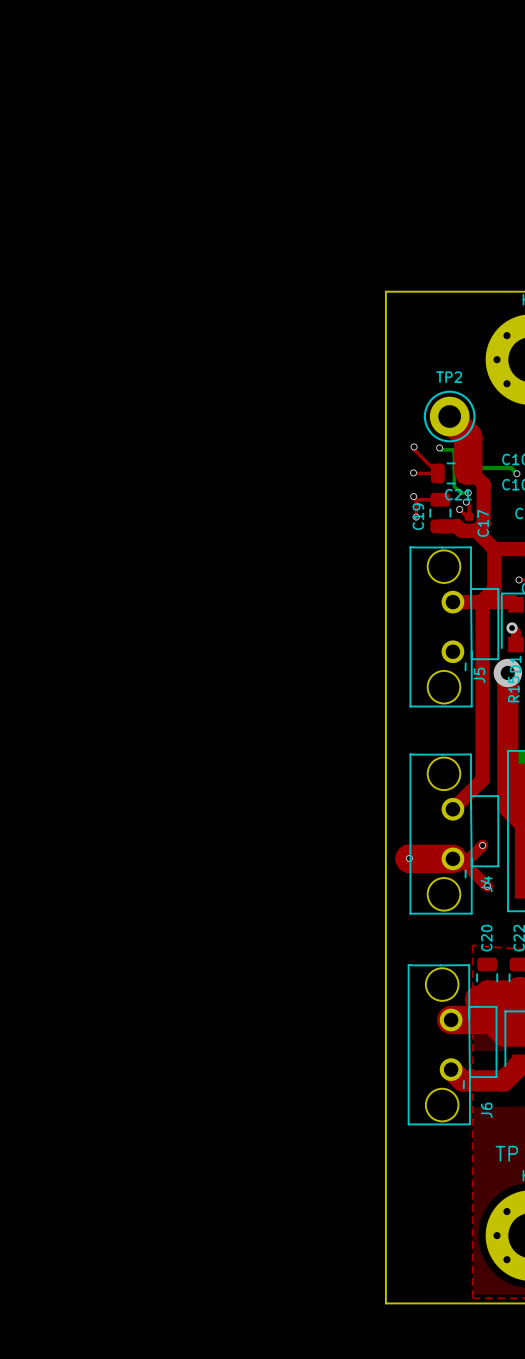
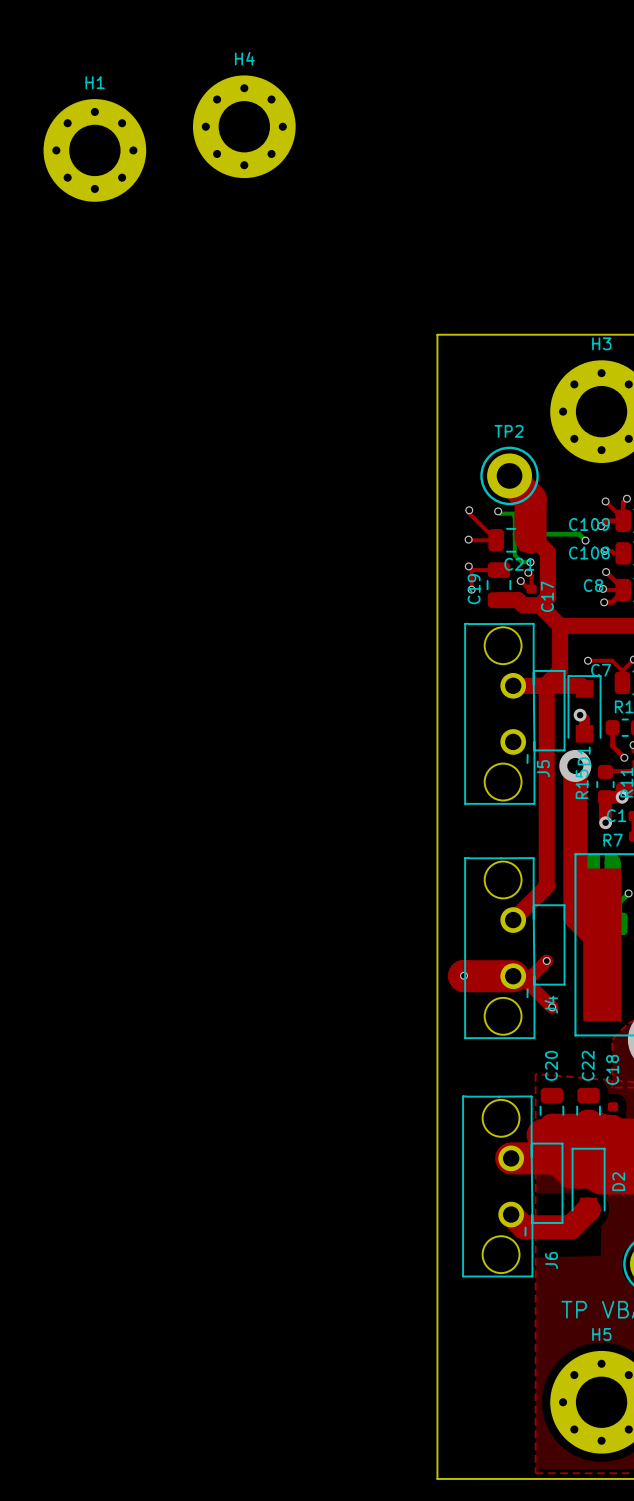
H4: none -> (244, 126)
H1: none -> (94, 150)

